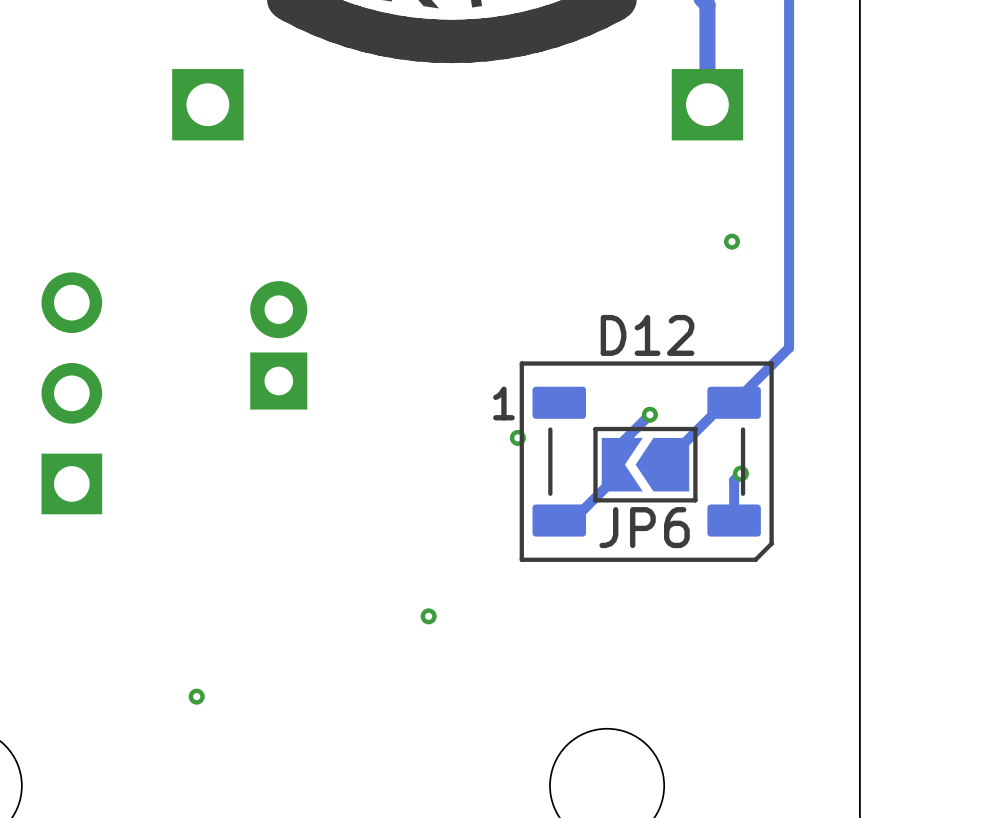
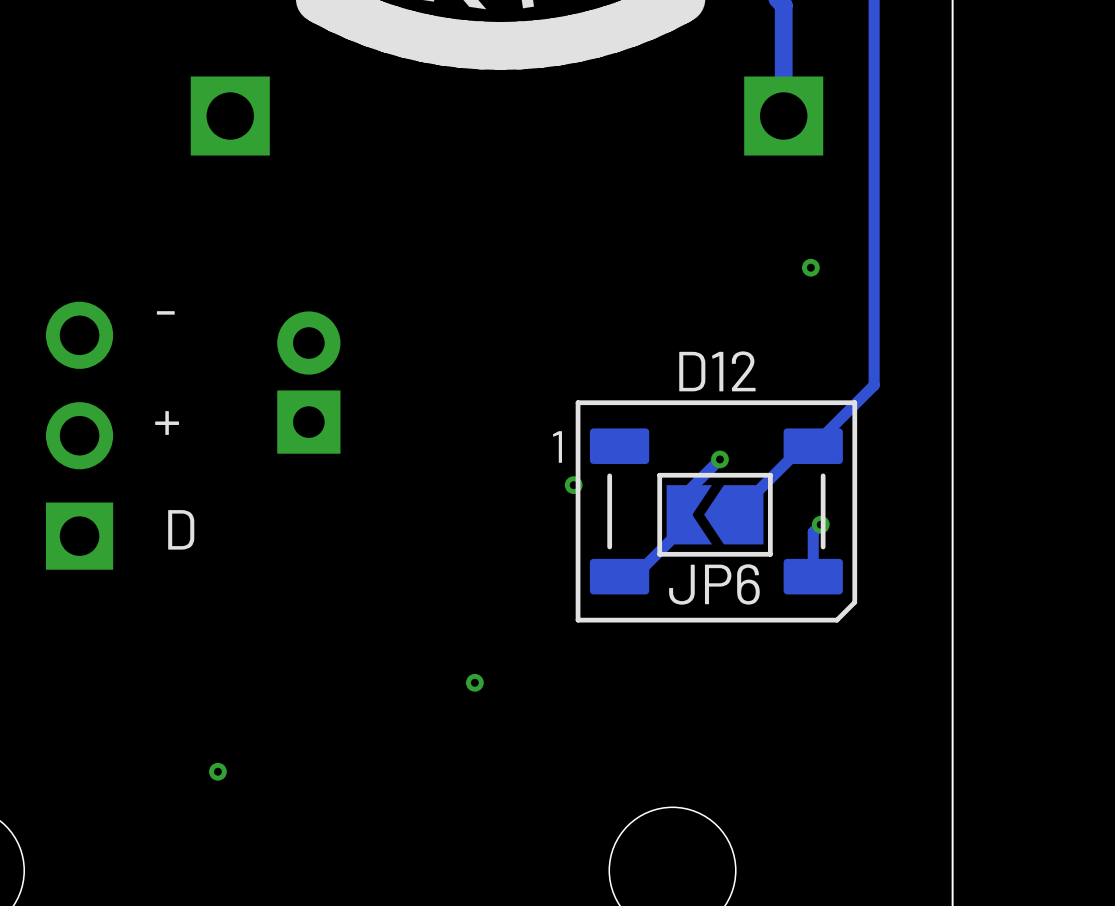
text: none -> - (165, 312)
text: none -> + (167, 423)
text: none -> D (181, 529)

